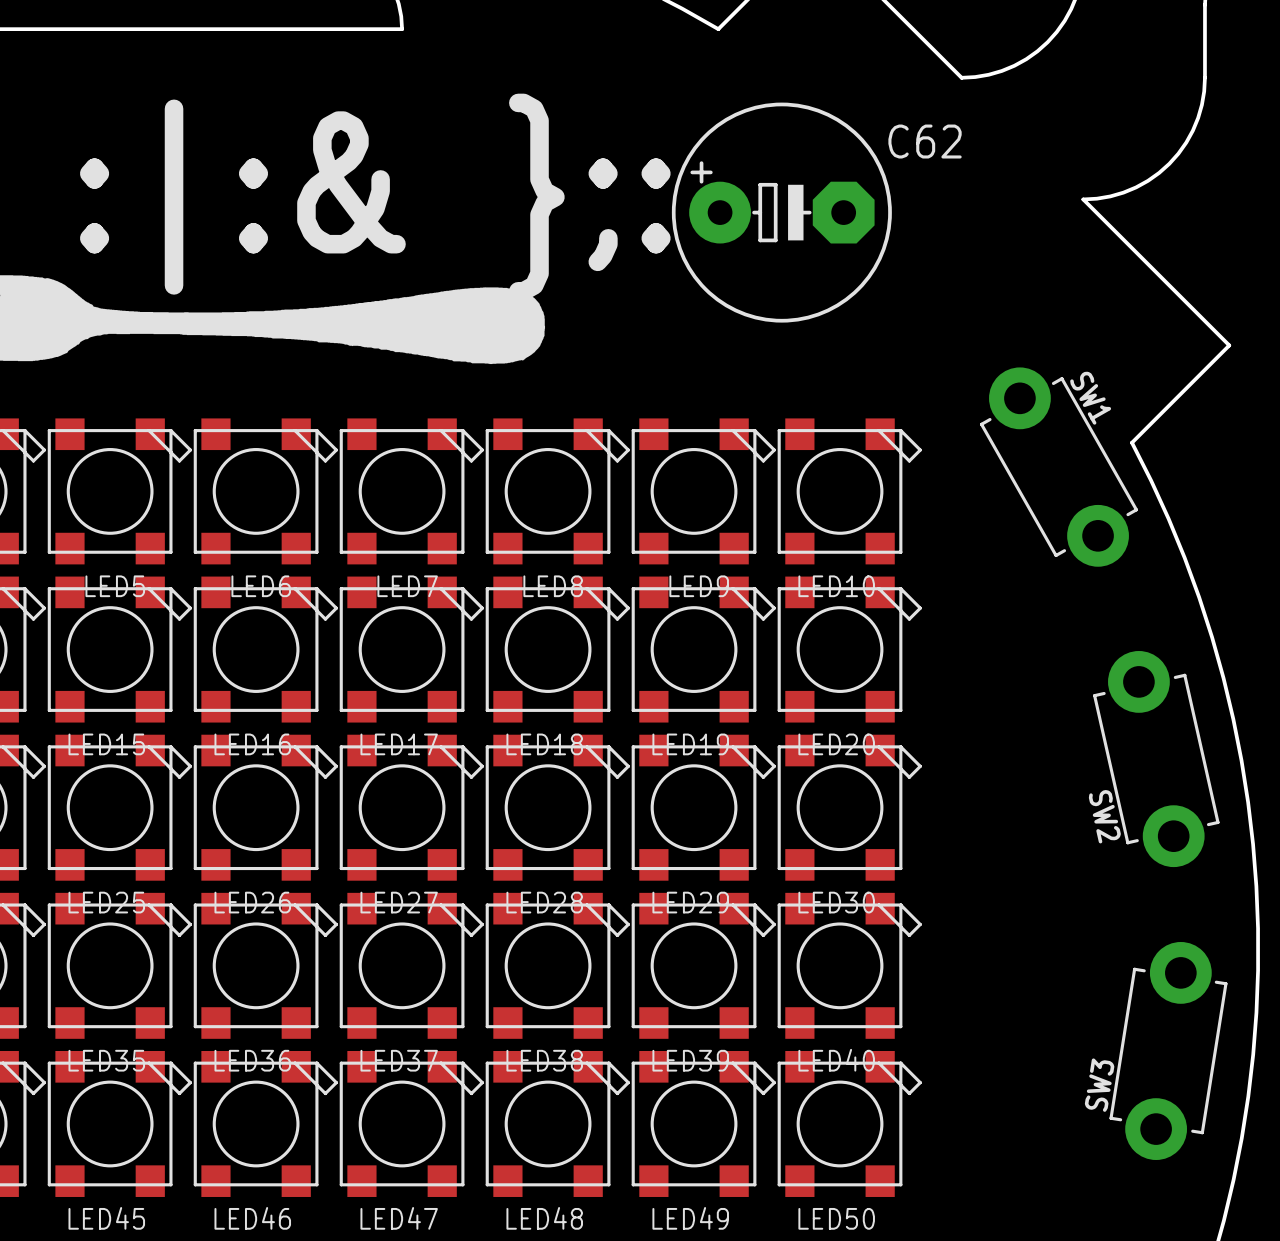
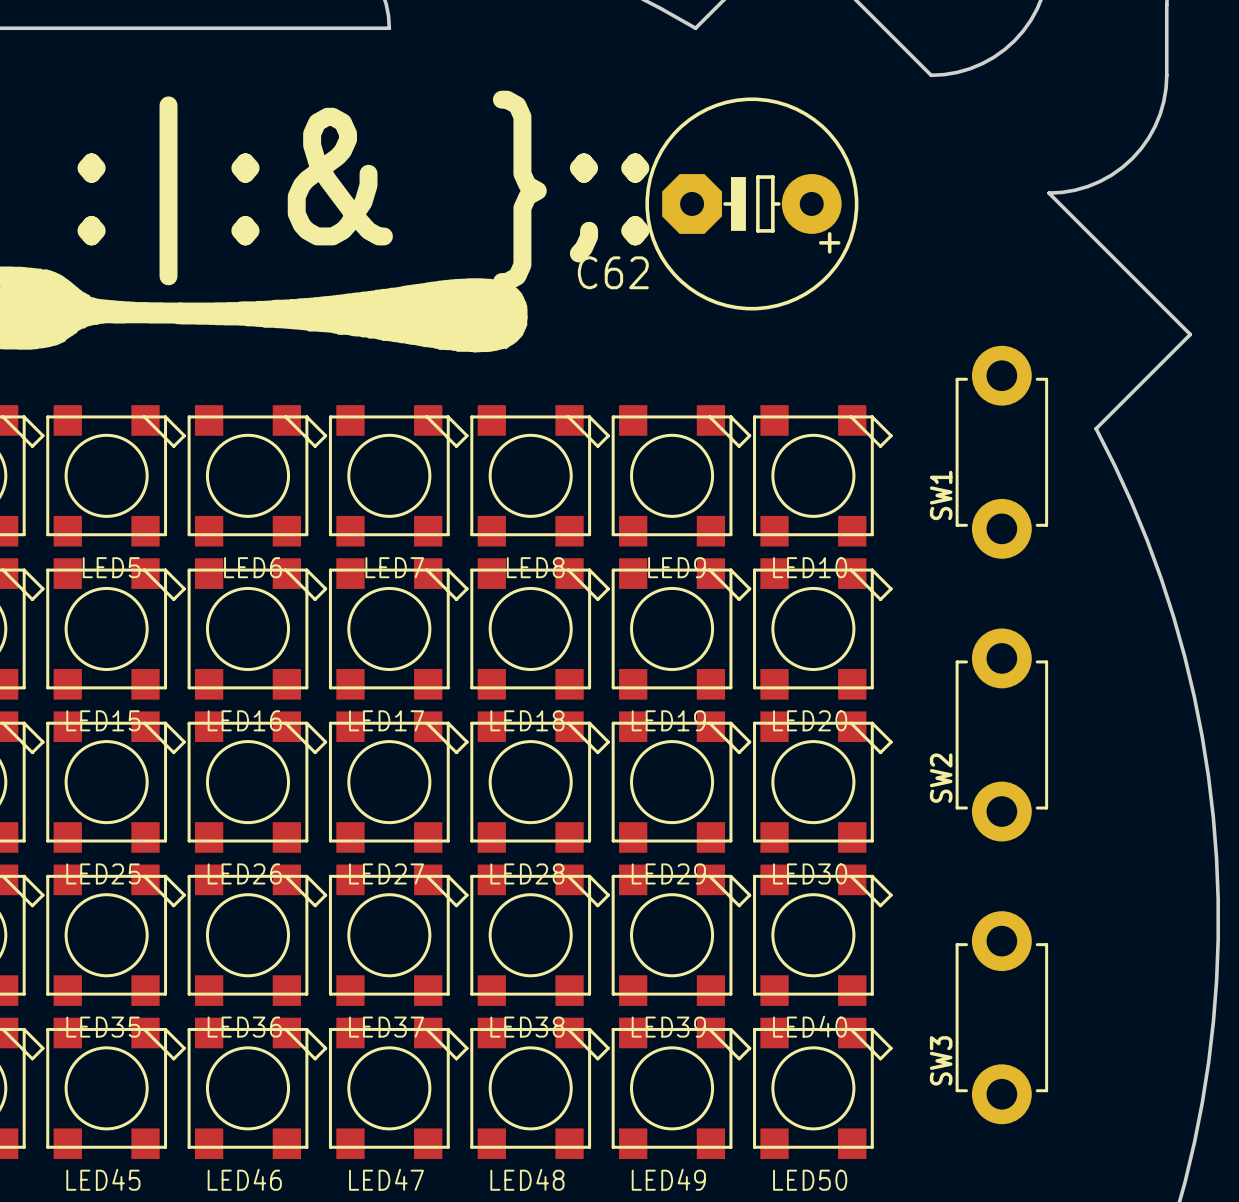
C62 rotation: 0° (781, 212) -> 180° (751, 203)
SW1 name position: SW1 (1090, 398) -> SW1 (941, 495)
SW1 rotation: 0° (1058, 467) -> 29.6° clockwise (1001, 452)
SW2 rotation: 0° (1156, 759) -> 12.7° clockwise (1001, 734)
SW3 rotation: 0° (1168, 1051) -> 9° counterclockwise (1001, 1017)
SW3 position: (1168, 1051) -> (1001, 1017)

